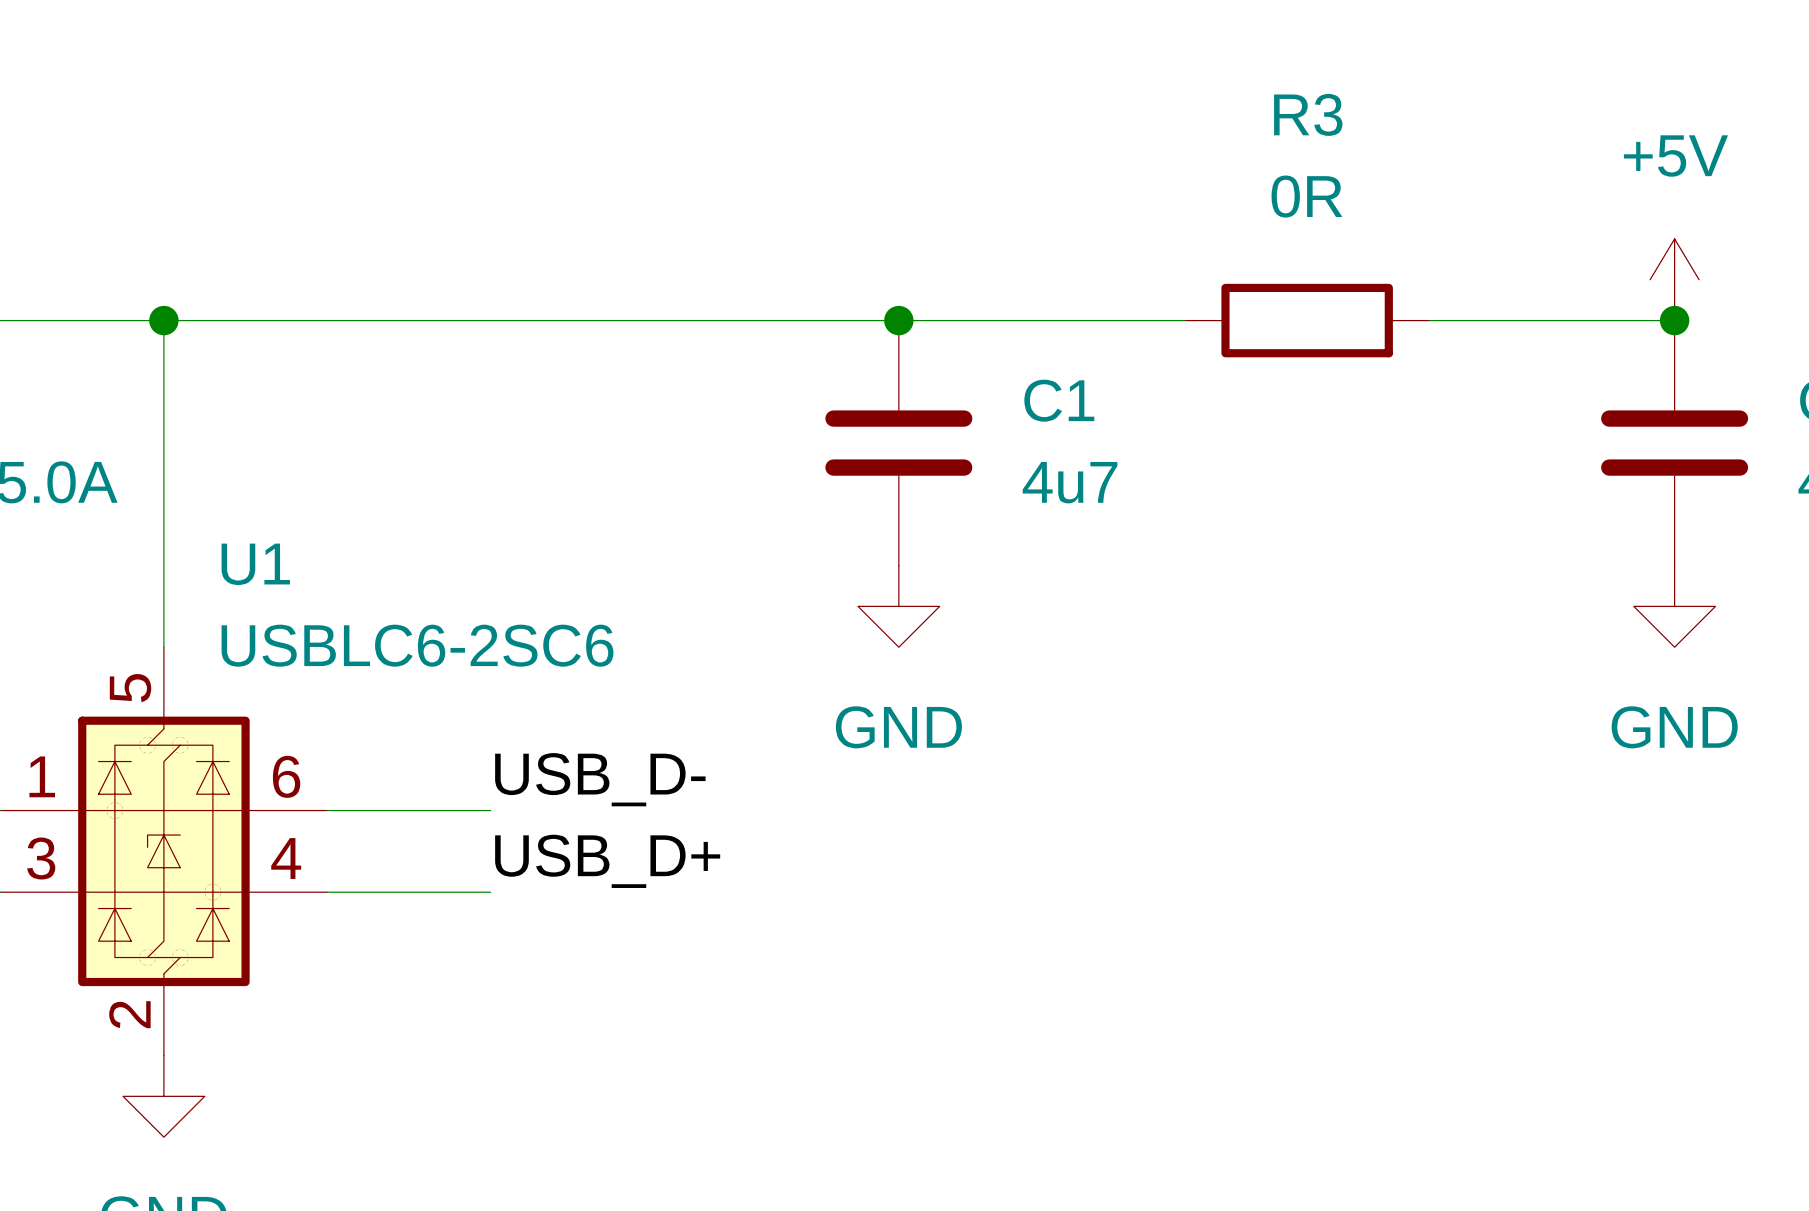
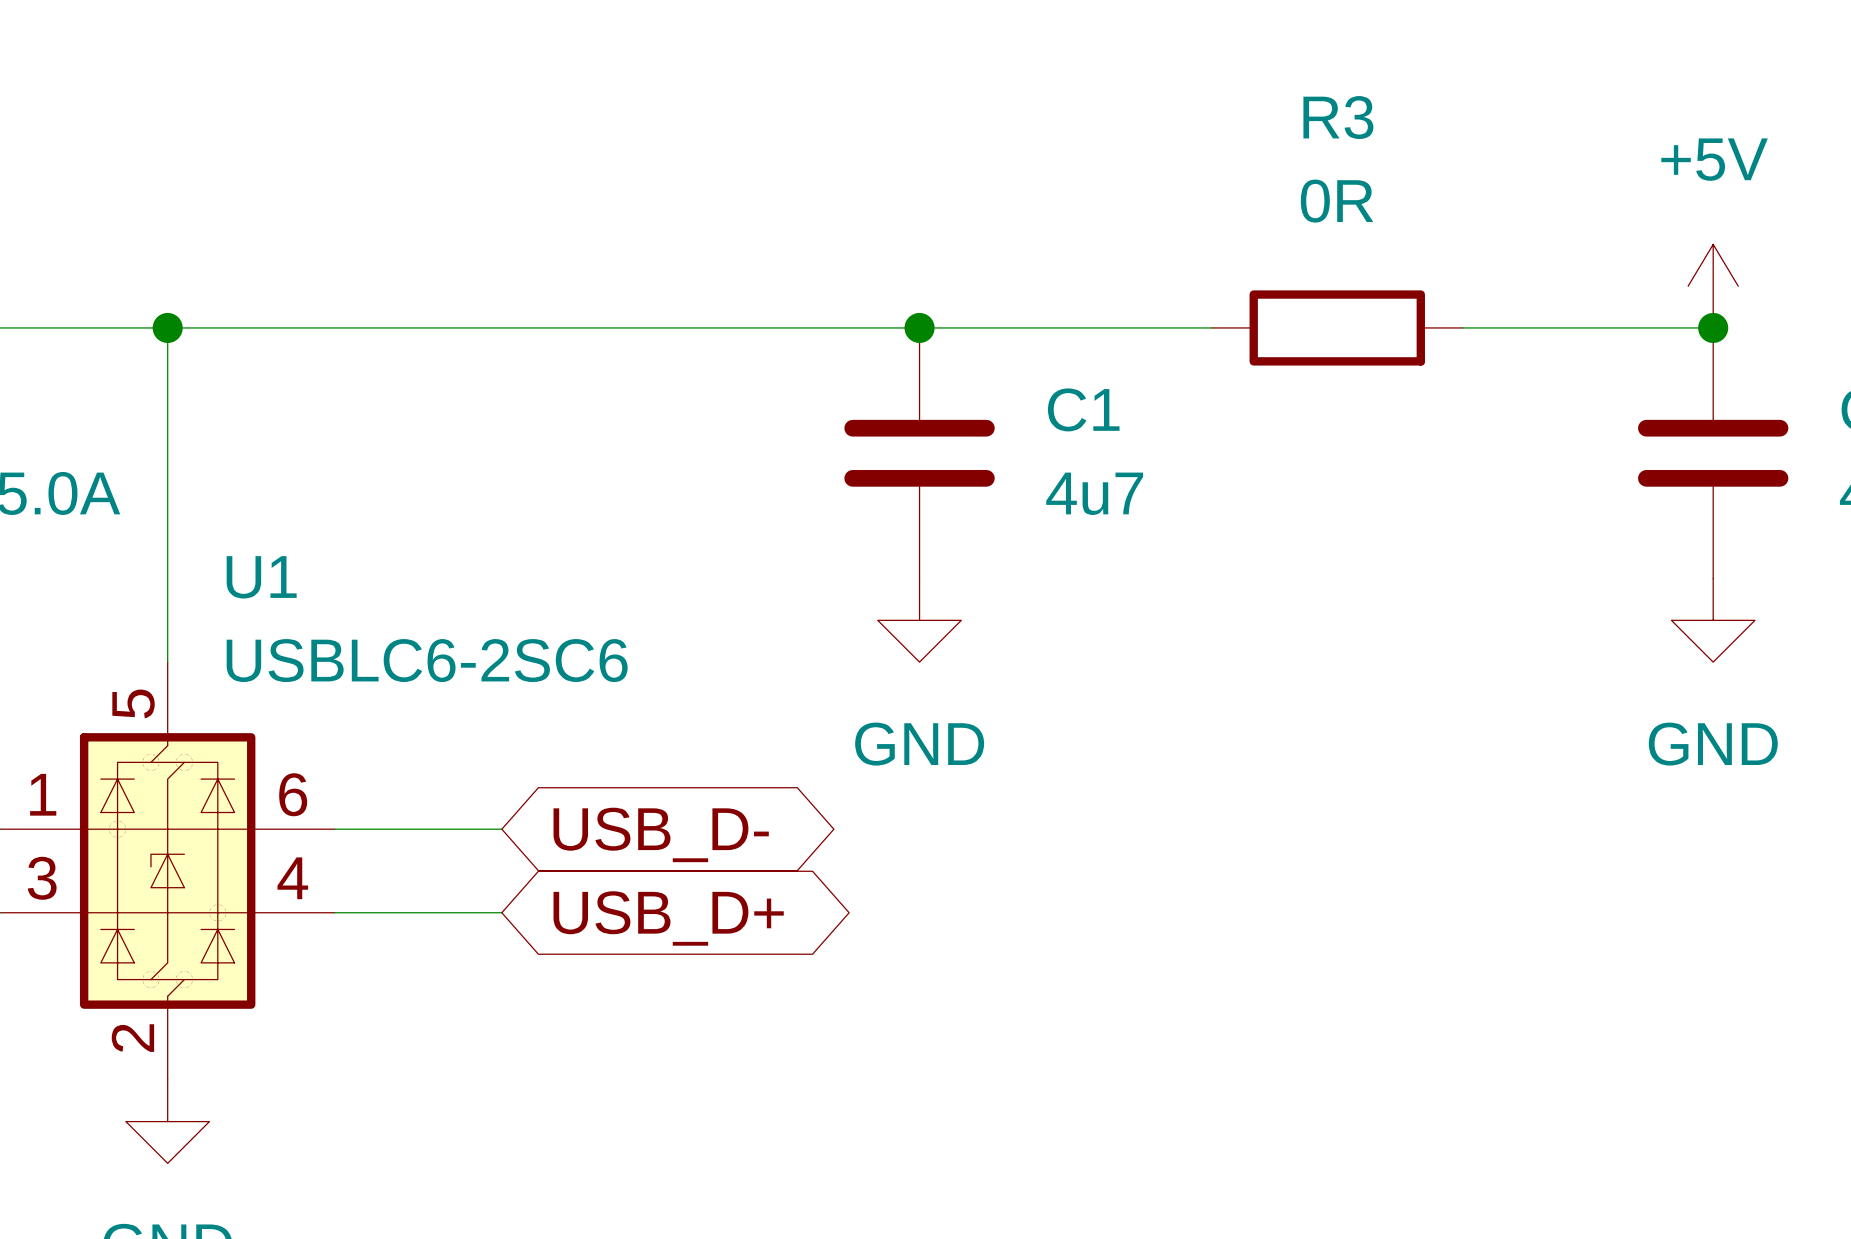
label: USB_D- (600, 779) -> none
global label: none -> USB_D- (661, 834)
label: USB_D+ (607, 861) -> none
global label: none -> USB_D+ (668, 918)

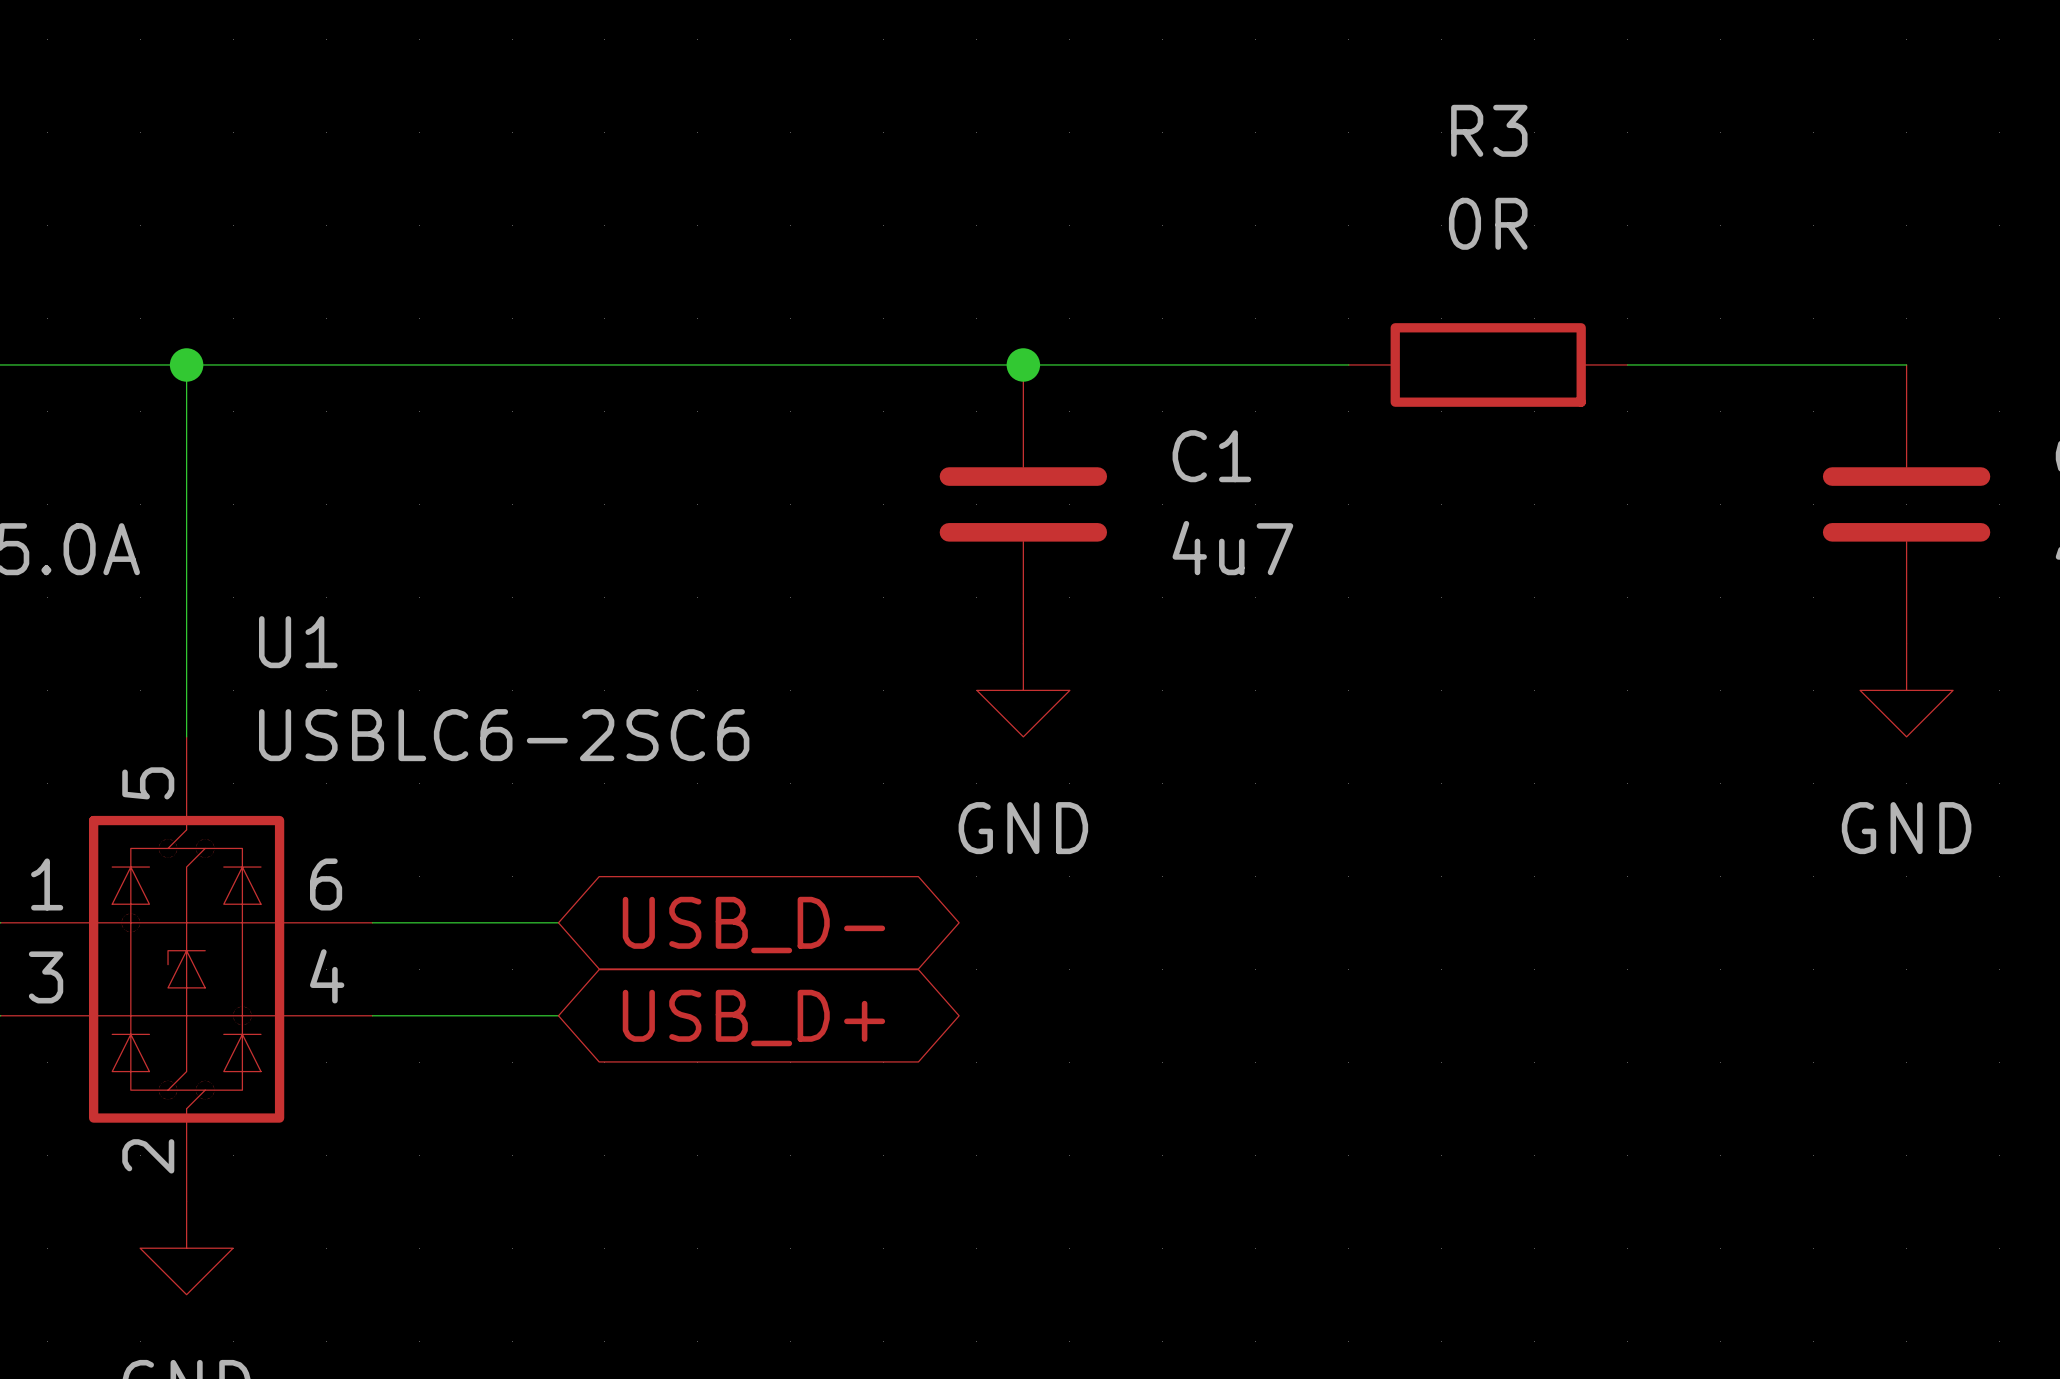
power symbol: +5V (1713, 286) -> none
junction: (1713, 327) -> none

